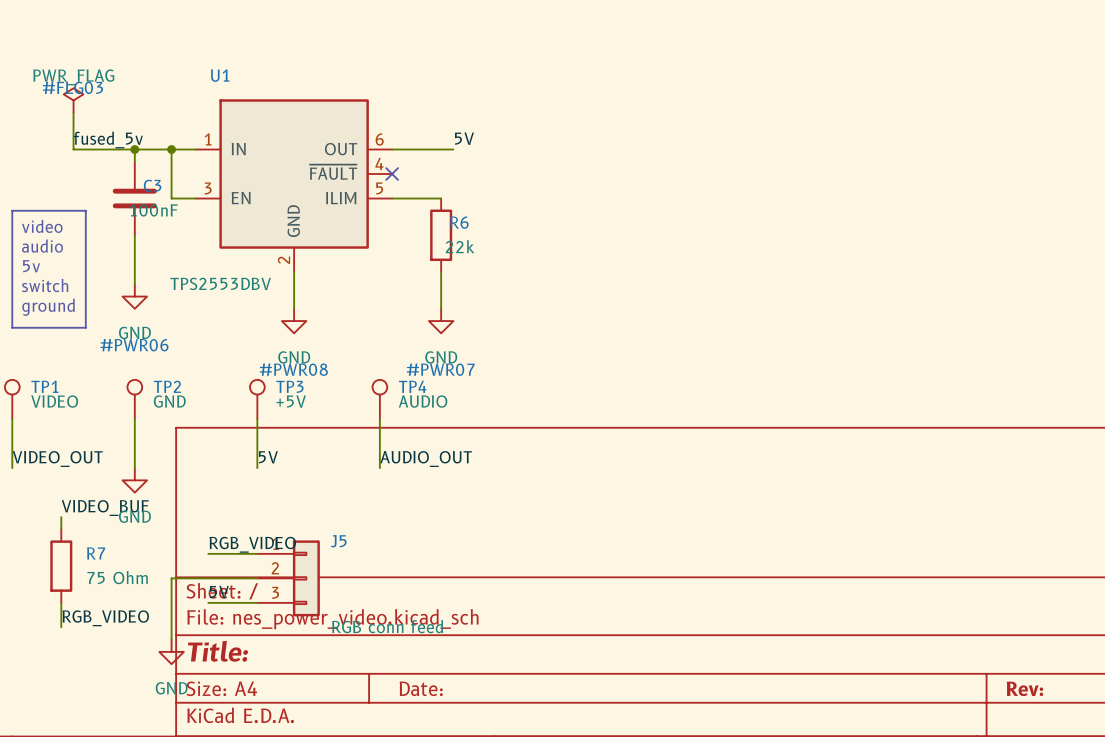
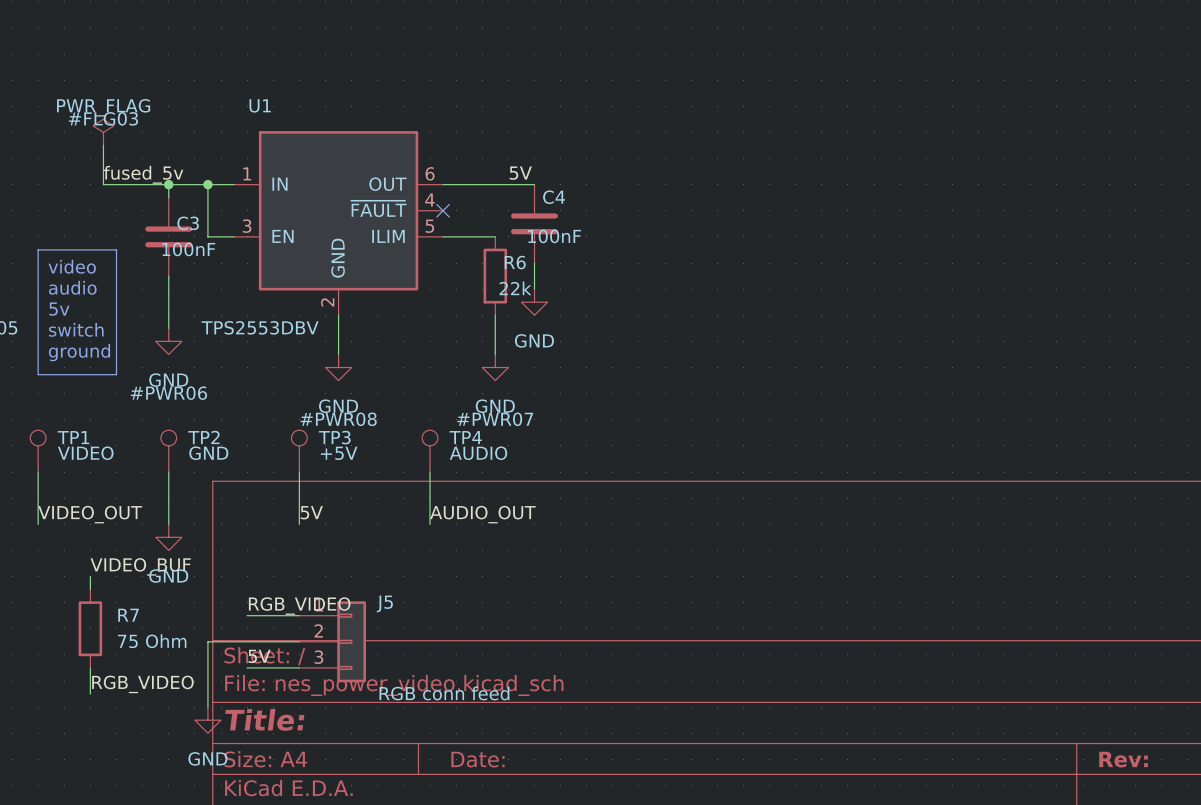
wire: none -> (508, 184) (534, 184)
C4: none -> 100nF (534, 223)
wire: none -> (534, 263) (534, 289)
power symbol: none -> GND (534, 302)

